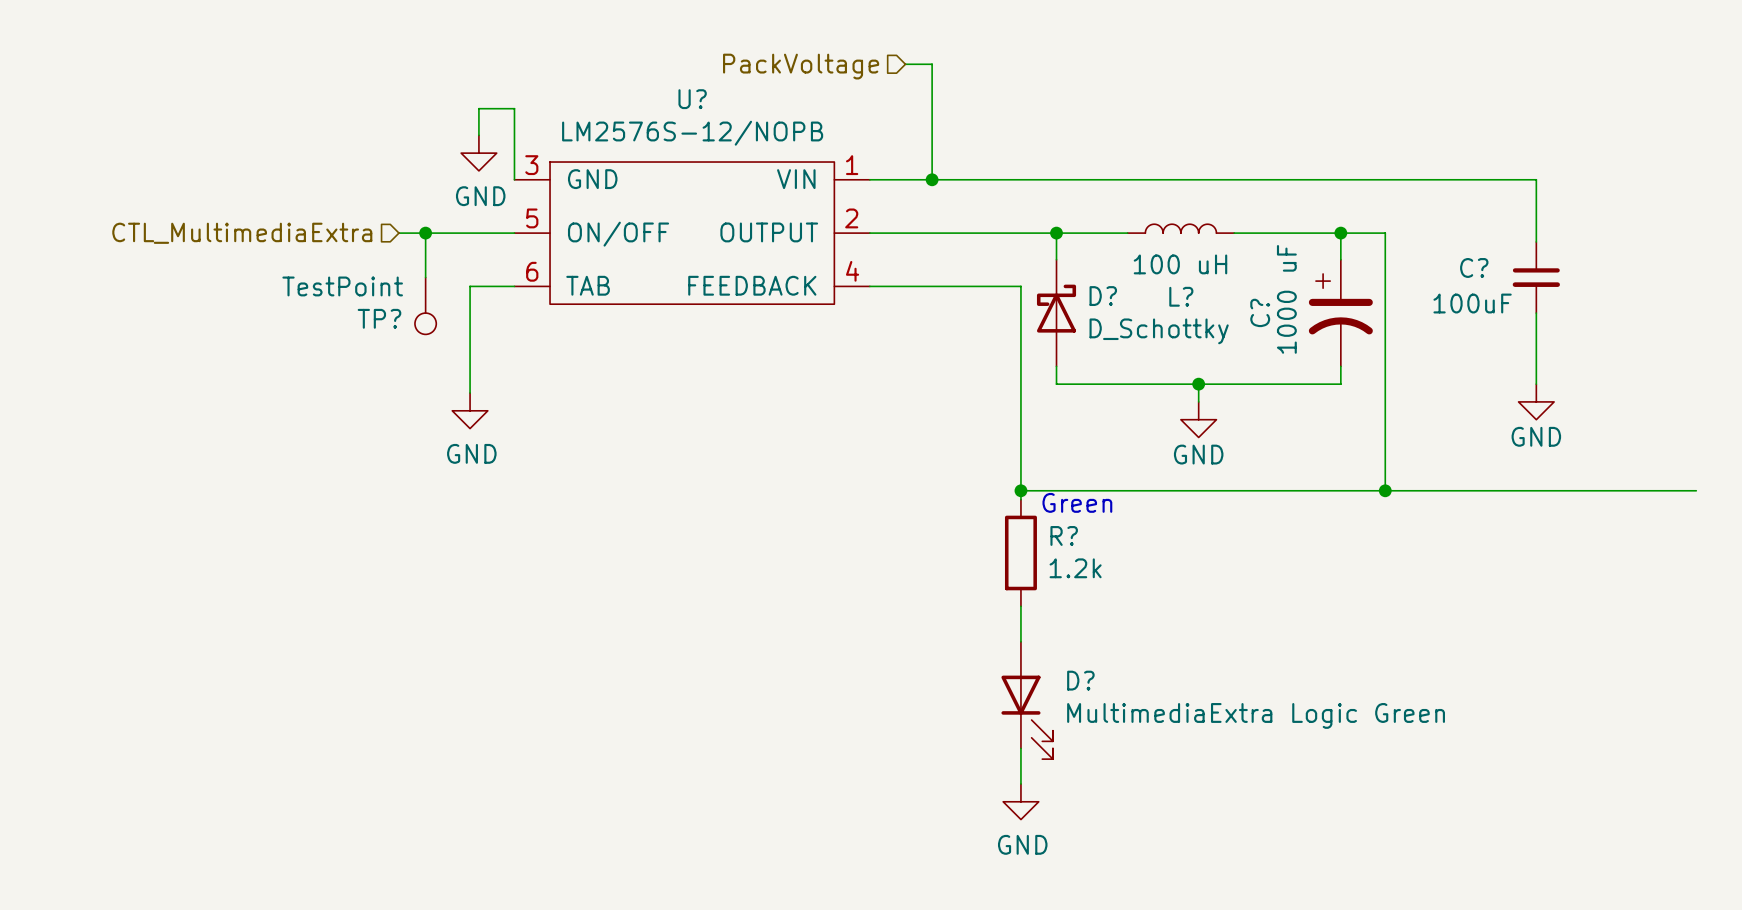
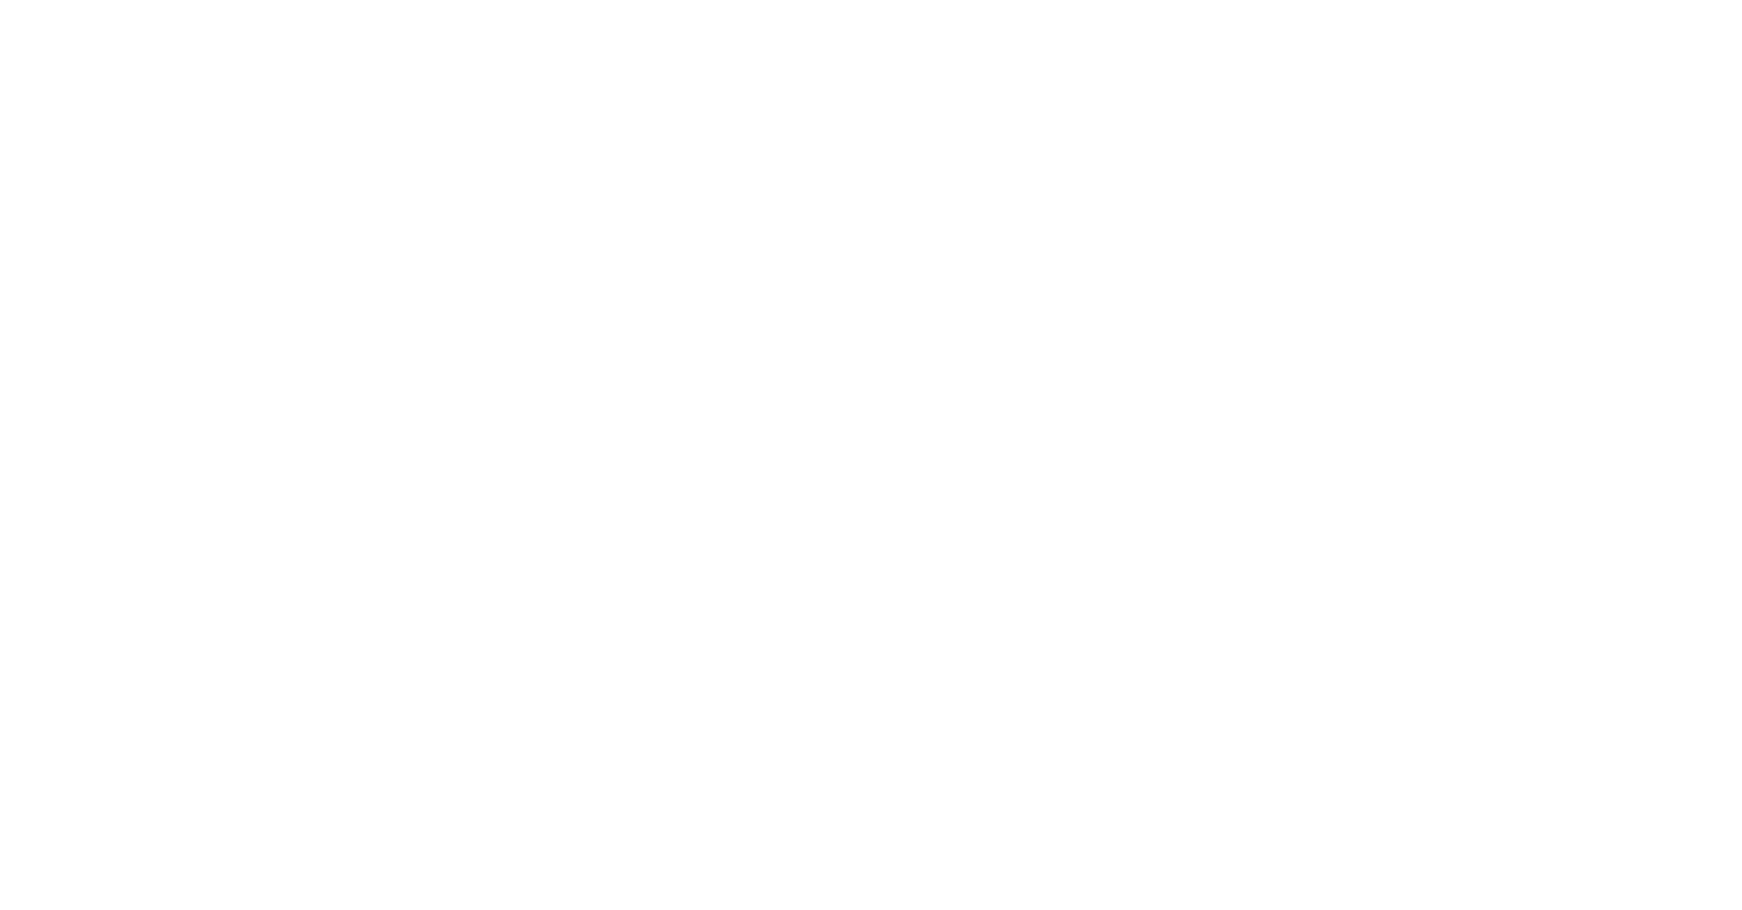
wire: (905, 64) (932, 64) (932, 179) -> none
hierarchical label: PackVoltage (801, 66) -> none
wire: (478, 135) (478, 108) (514, 108) (514, 179) -> none
power symbol: GND (478, 153) -> none
wire: (869, 179) (1536, 179) (1536, 241) -> none
junction: (932, 179) -> none
L?: 100 uH (1180, 228) -> none
hierarchical label: CTL_MultimediaExtra (242, 233) -> none
wire: (398, 233) (514, 233) -> none
wire: (425, 233) (425, 277) -> none
junction: (425, 233) -> none
U?: LM2576S-12/NOPB (692, 233) -> none
wire: (869, 233) (1127, 233) -> none
wire: (1056, 233) (1056, 259) -> none
junction: (1056, 233) -> none
wire: (1234, 233) (1385, 233) (1385, 490) -> none
wire: (1340, 233) (1340, 259) -> none
junction: (1340, 233) -> none
C?: 100uF (1536, 277) -> none
wire: (514, 286) (470, 286) (470, 393) -> none
wire: (869, 286) (1020, 286) (1020, 499) -> none
TP?: TestPoint (425, 305) -> none
D?: D_Schottky (1056, 313) -> none
C?: 1000 uF (1340, 313) -> none
wire: (1536, 313) (1536, 384) -> none
wire: (1056, 366) (1056, 384) (1340, 384) (1340, 366) -> none
wire: (1198, 384) (1198, 401) -> none
junction: (1198, 384) -> none
power symbol: GND (1536, 401) -> none
power symbol: GND (470, 410) -> none
power symbol: GND (1198, 419) -> none
wire: (1020, 490) (1696, 490) -> none
junction: (1020, 490) -> none
junction: (1385, 490) -> none
text: Green (1077, 502) -> none
R?: 1.2k (1020, 552) -> none
wire: (1020, 606) (1020, 641) -> none
D?: MultimediaExtra Logic Green (1027, 700) -> none
wire: (1020, 748) (1020, 784) -> none
power symbol: GND (1020, 801) -> none

